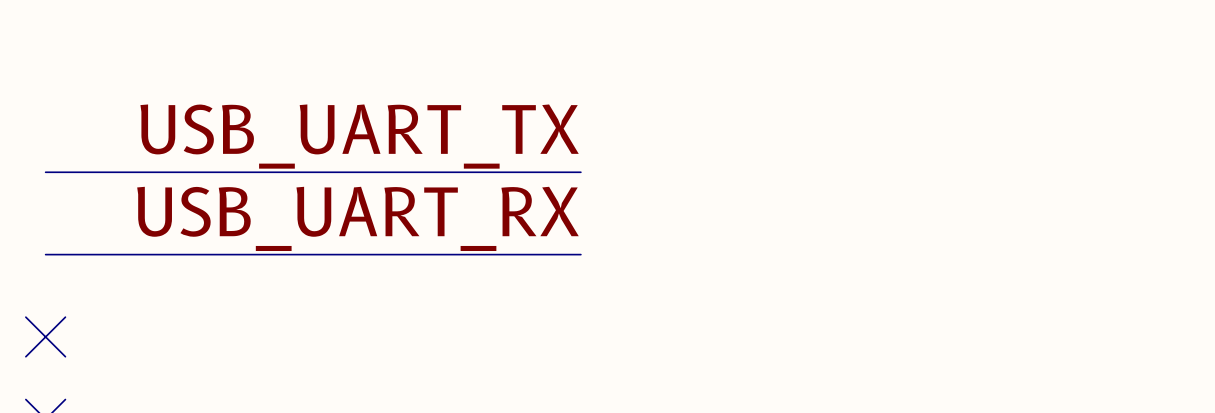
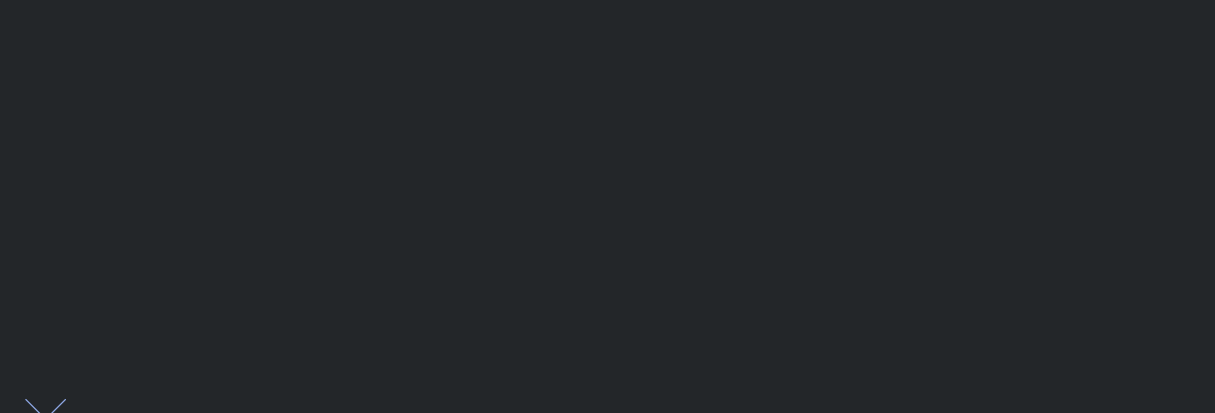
label: USB_UART_TX (359, 136) -> none
wire: (45, 172) (580, 172) -> none
label: USB_UART_RX (357, 218) -> none
wire: (45, 254) (580, 254) -> none
no-connect mark: (45, 336) -> none

